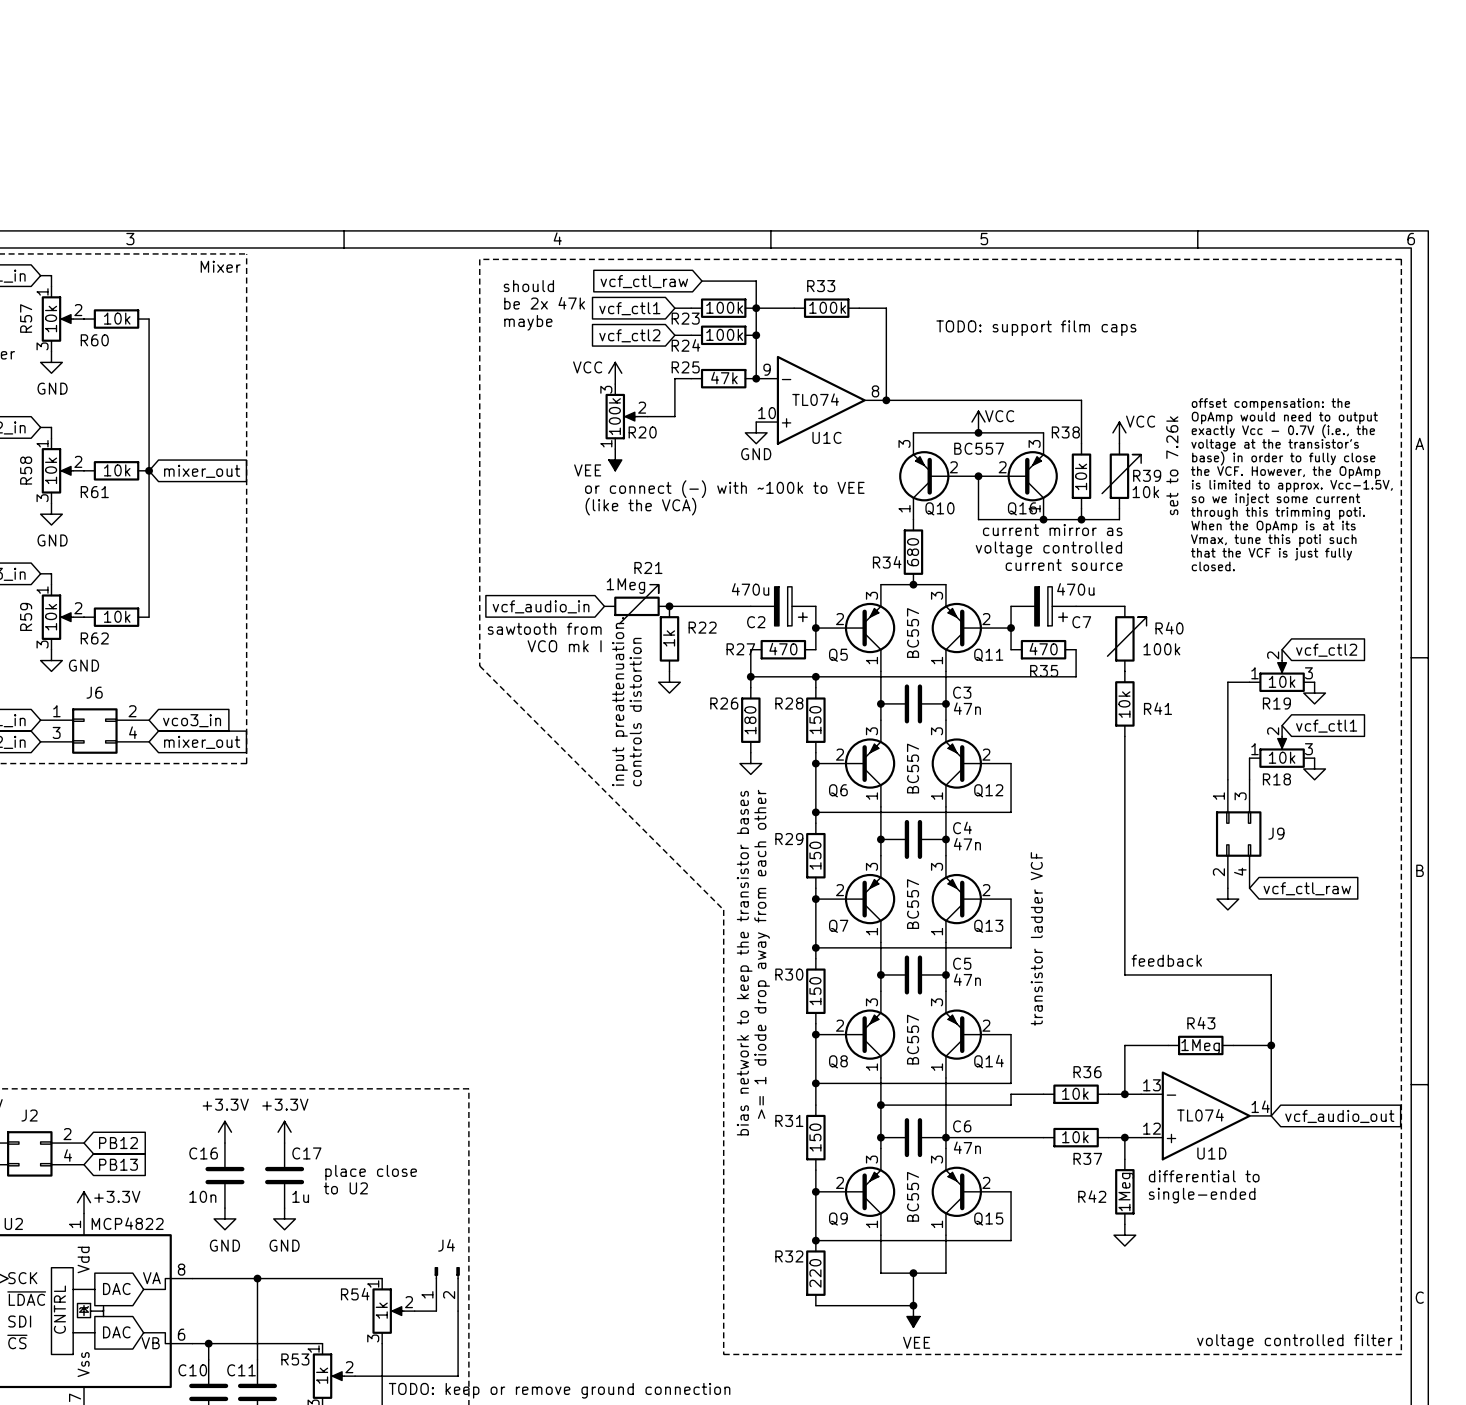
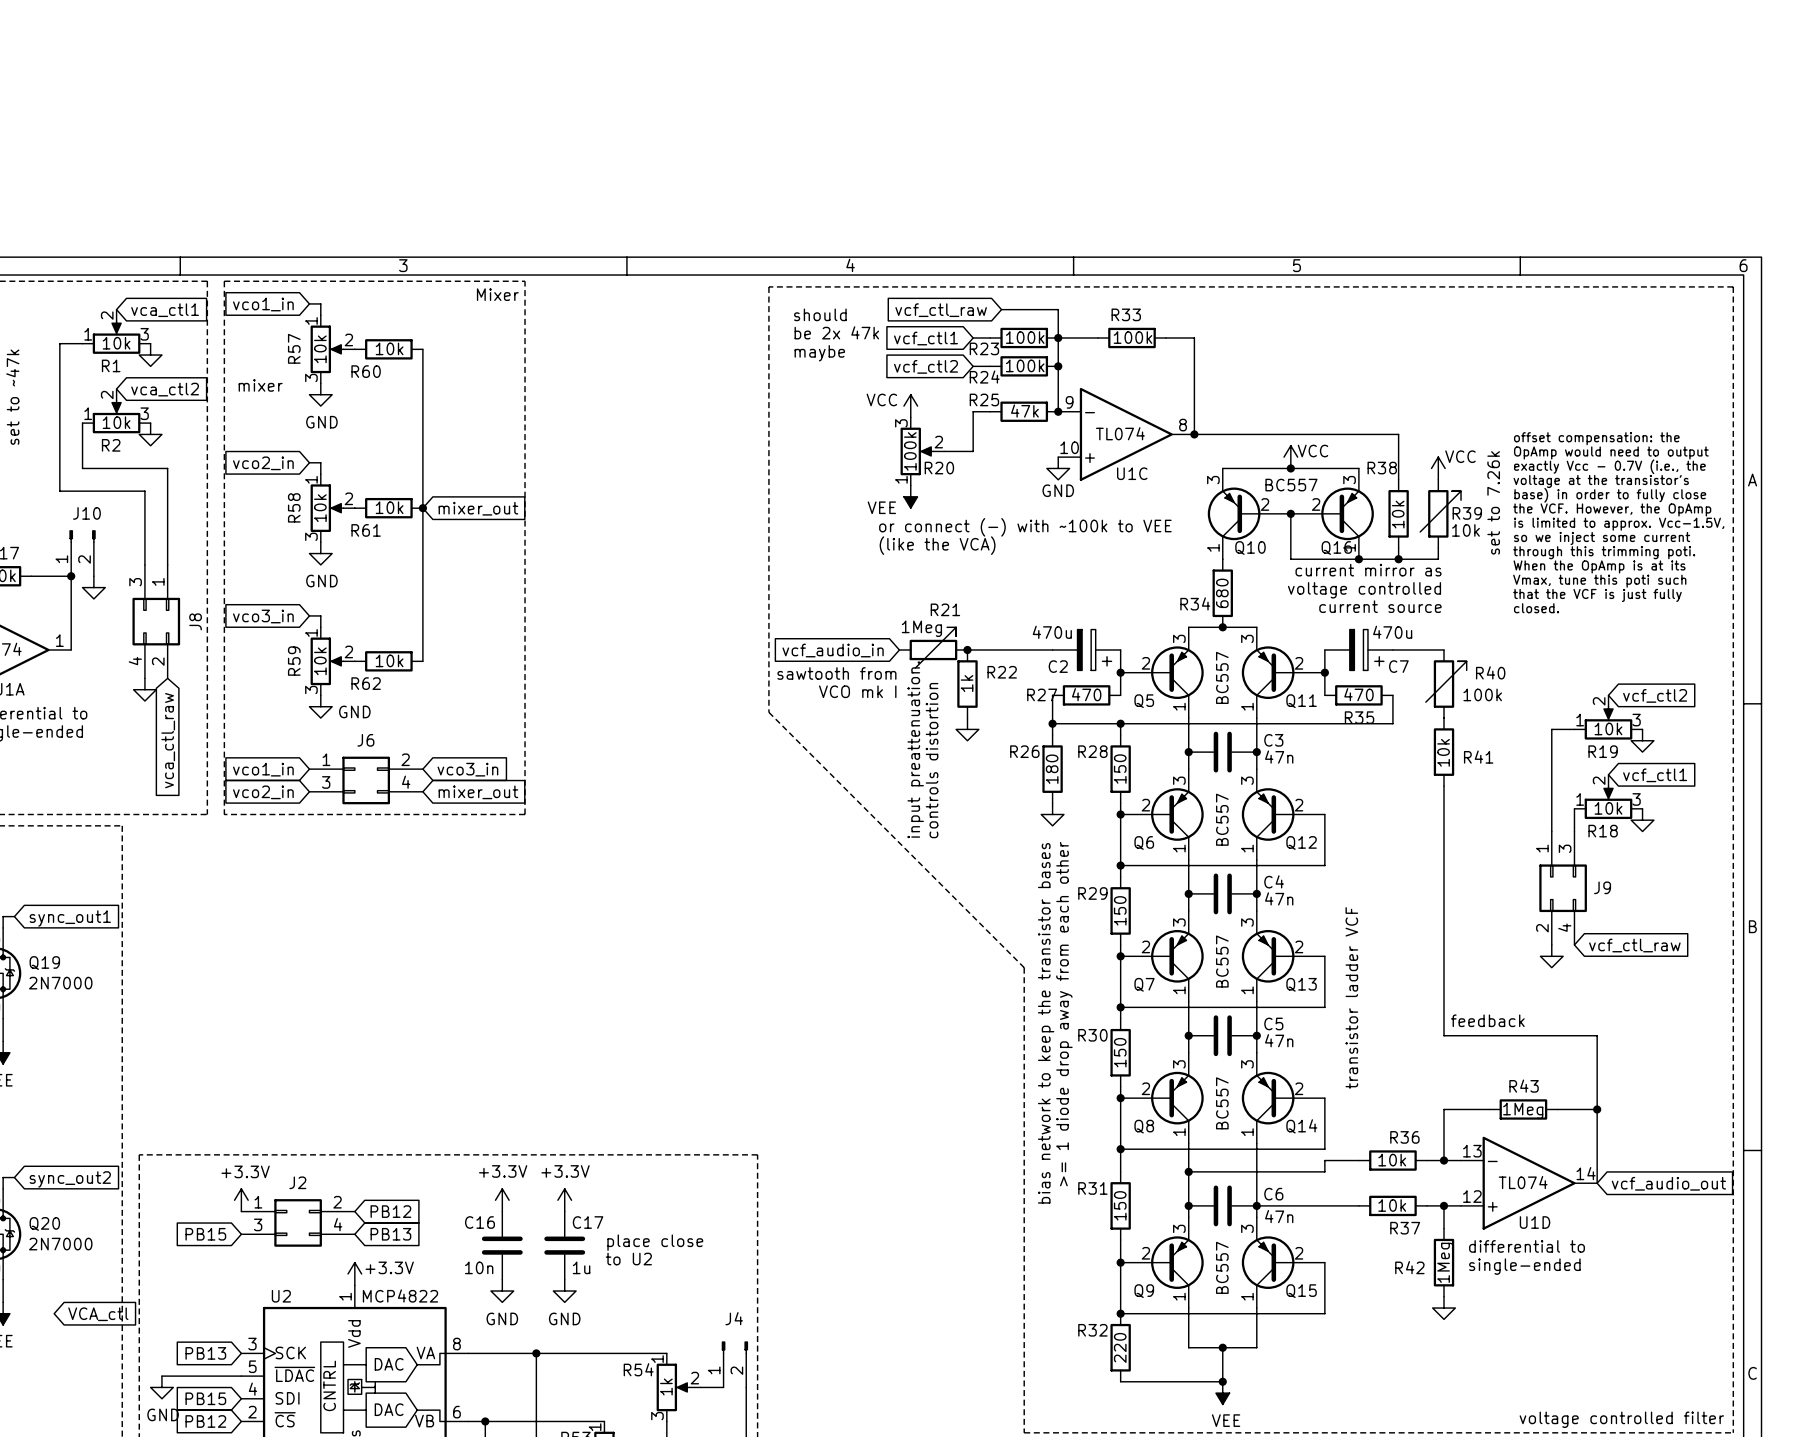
text: TODO: support film caps (1036, 328) -> none

